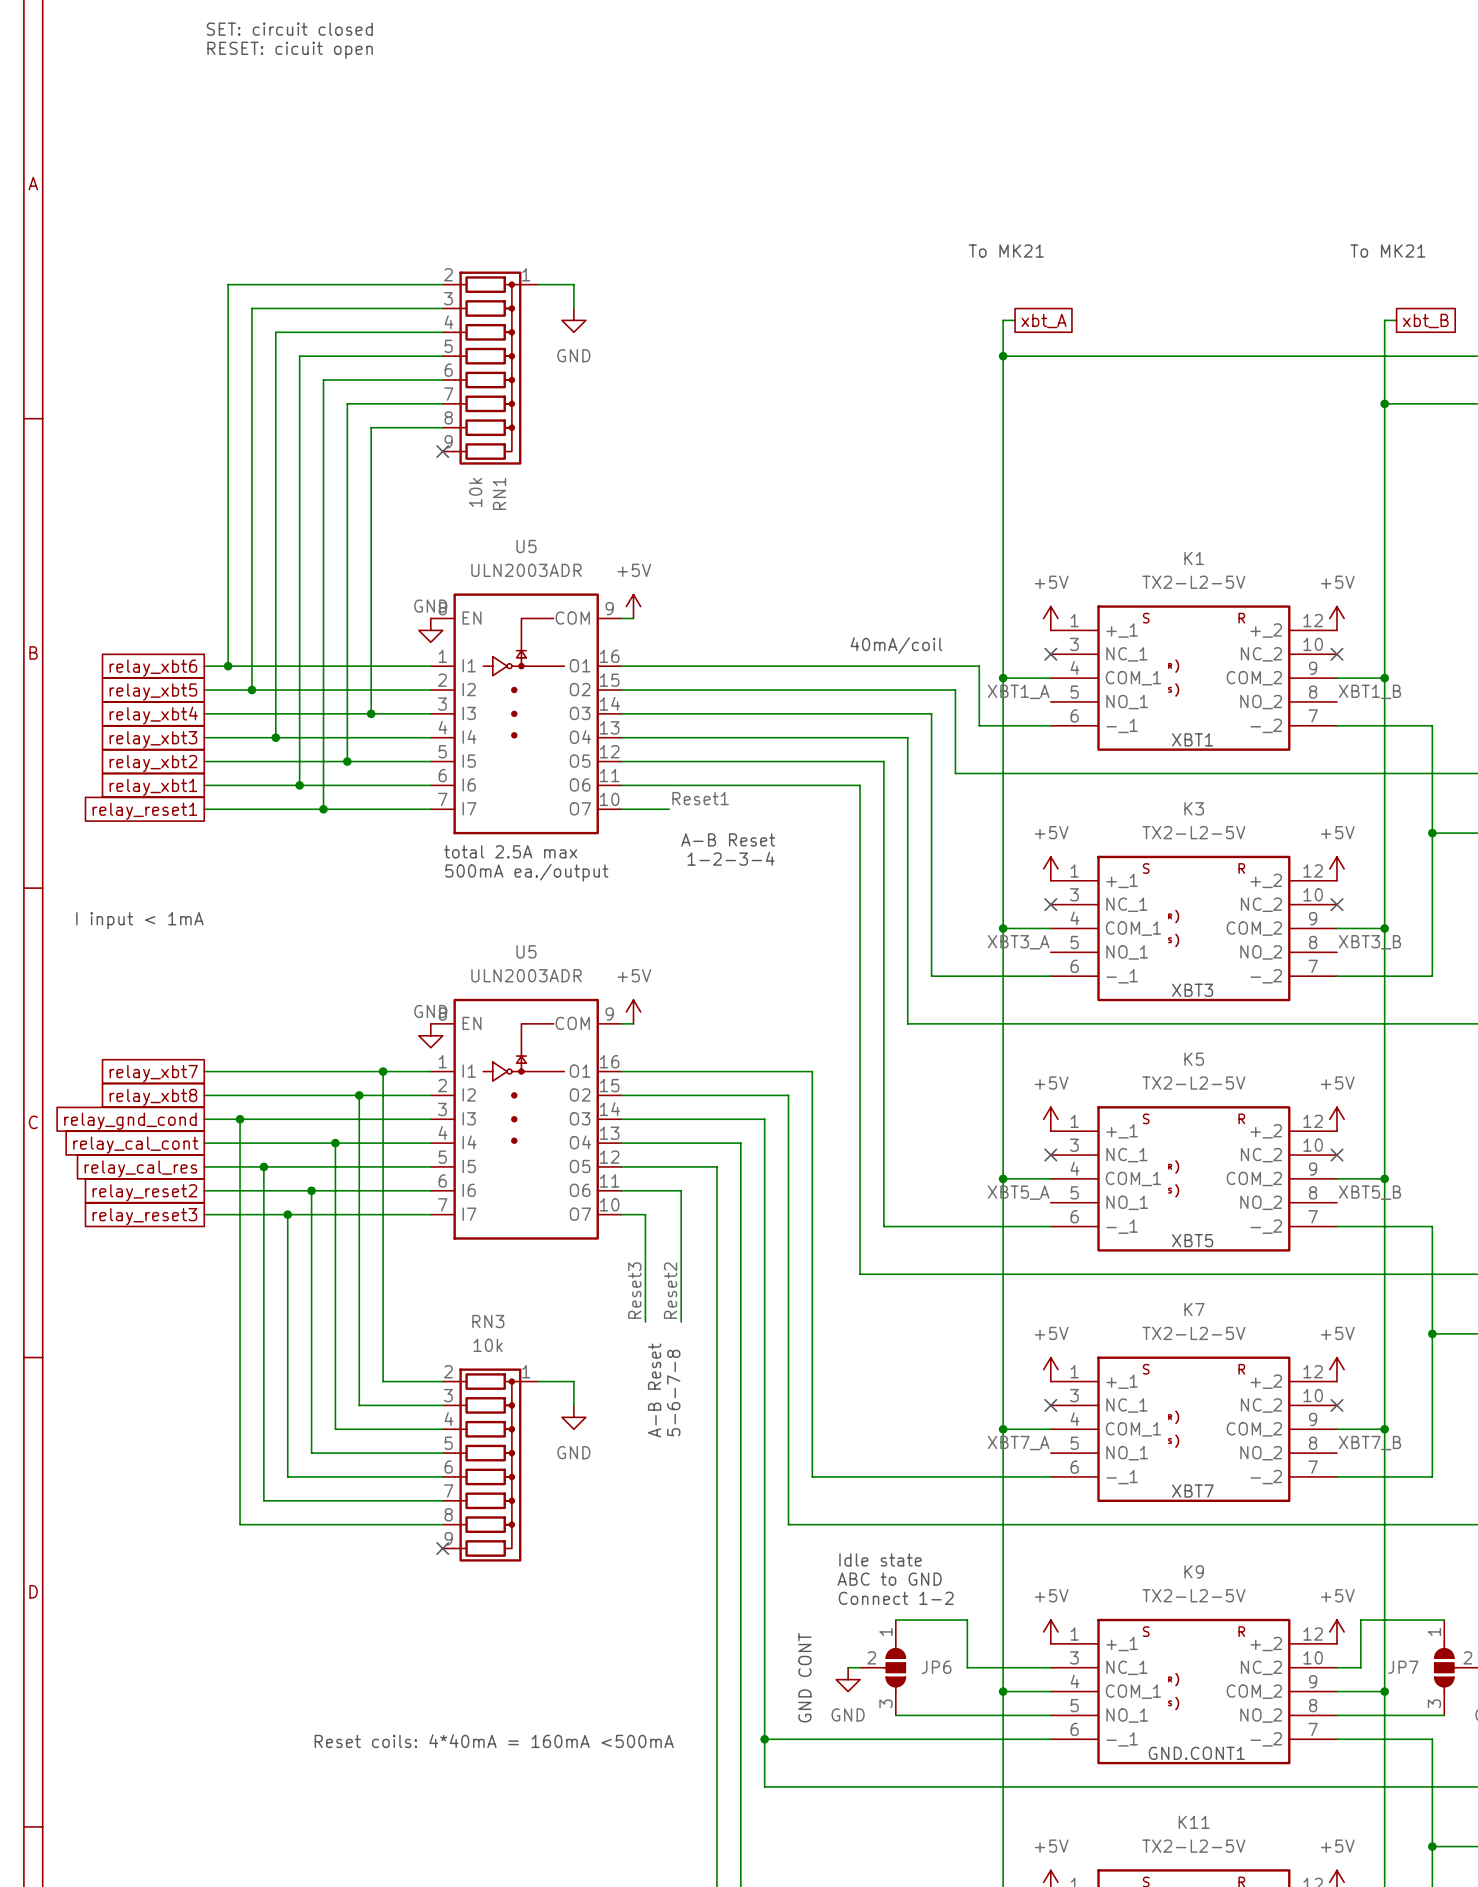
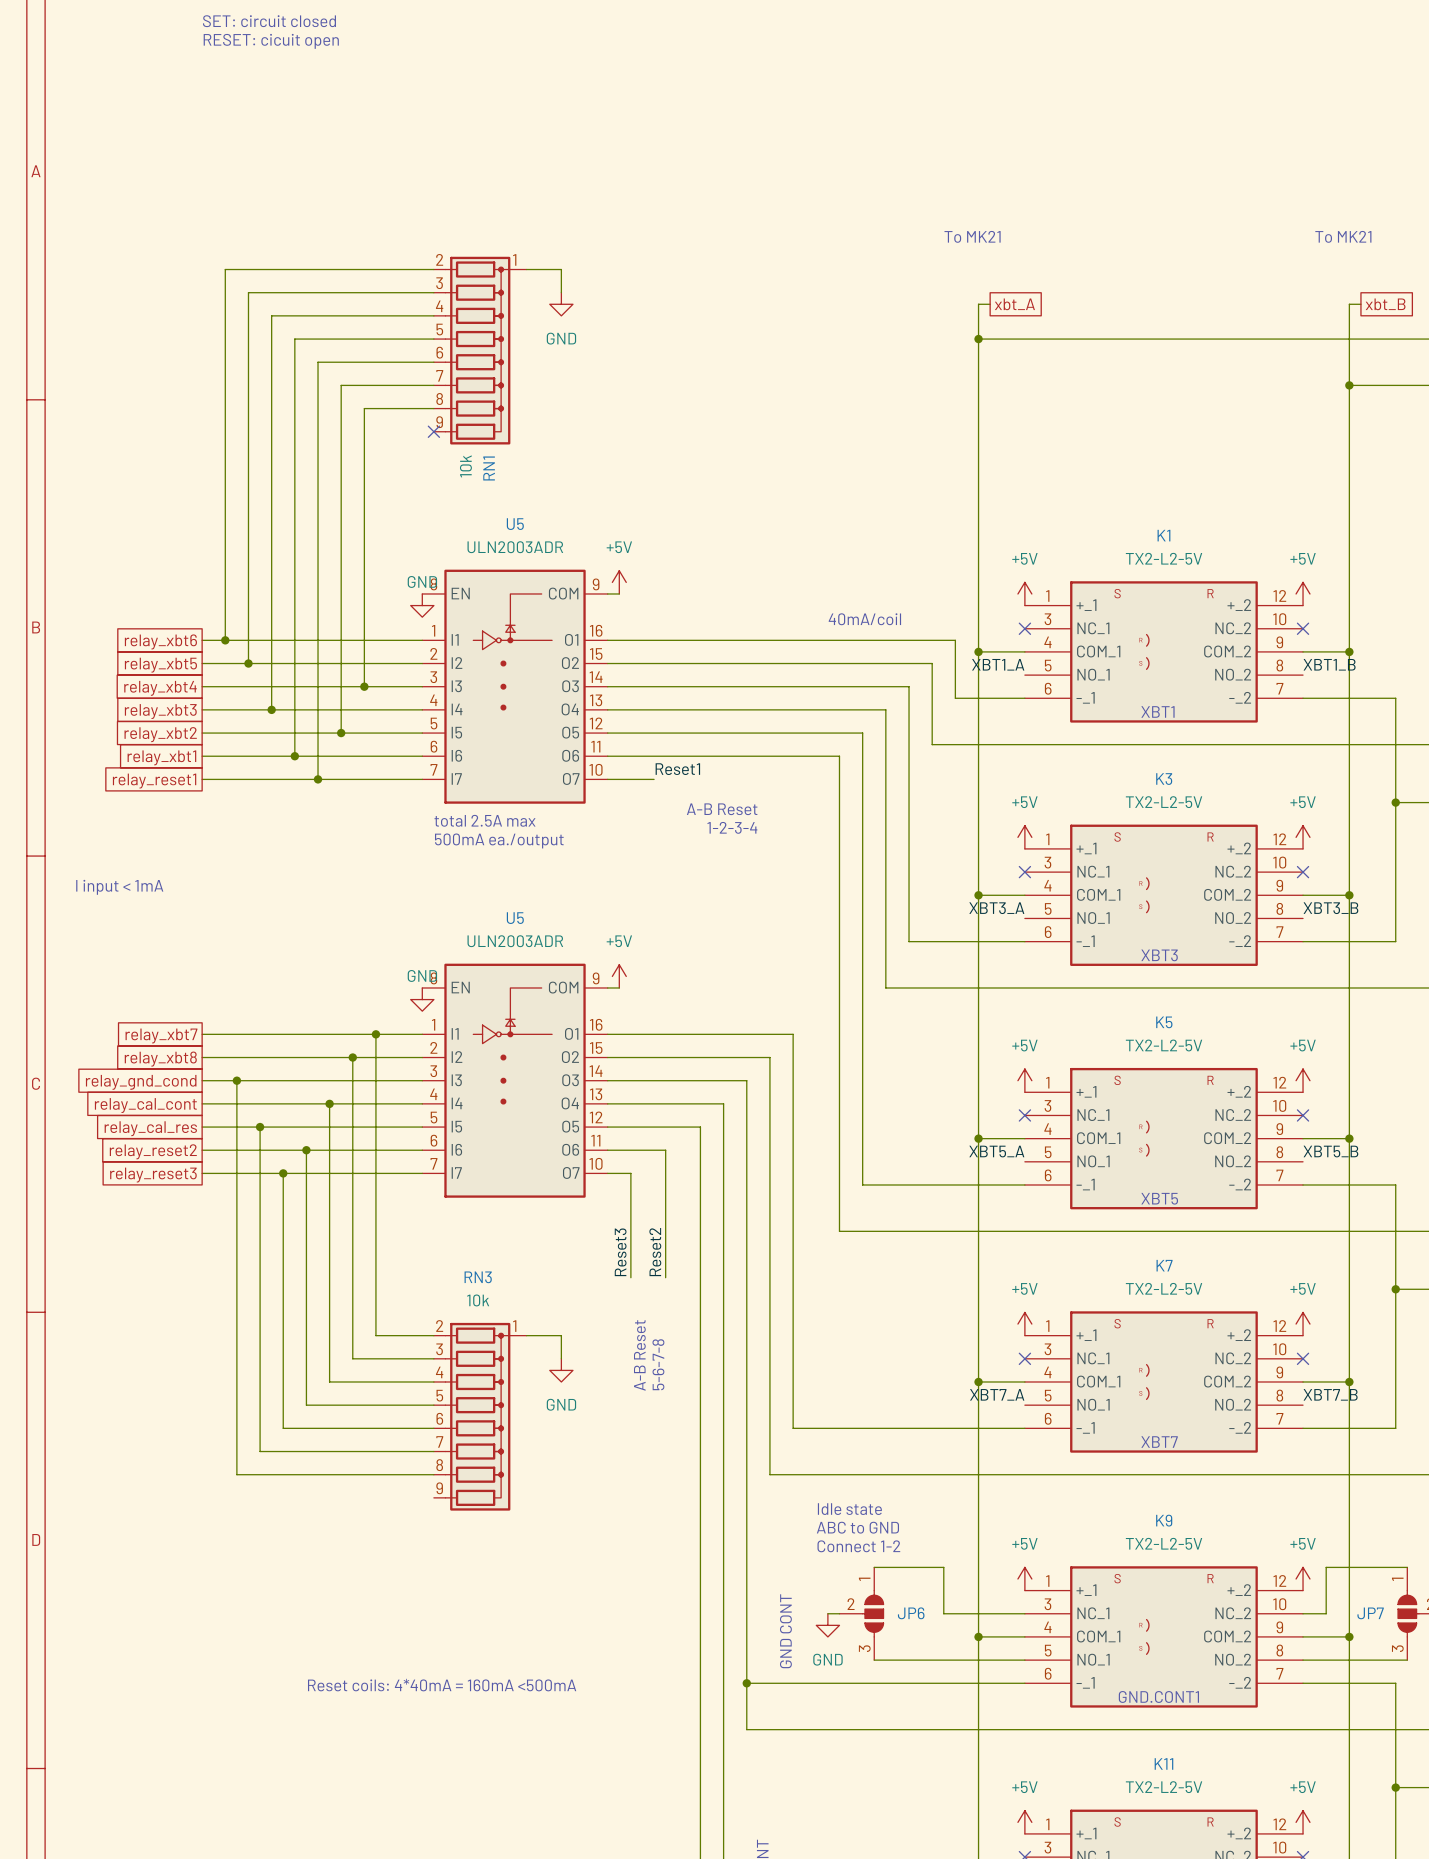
no-connect mark: (442, 1548) -> none

